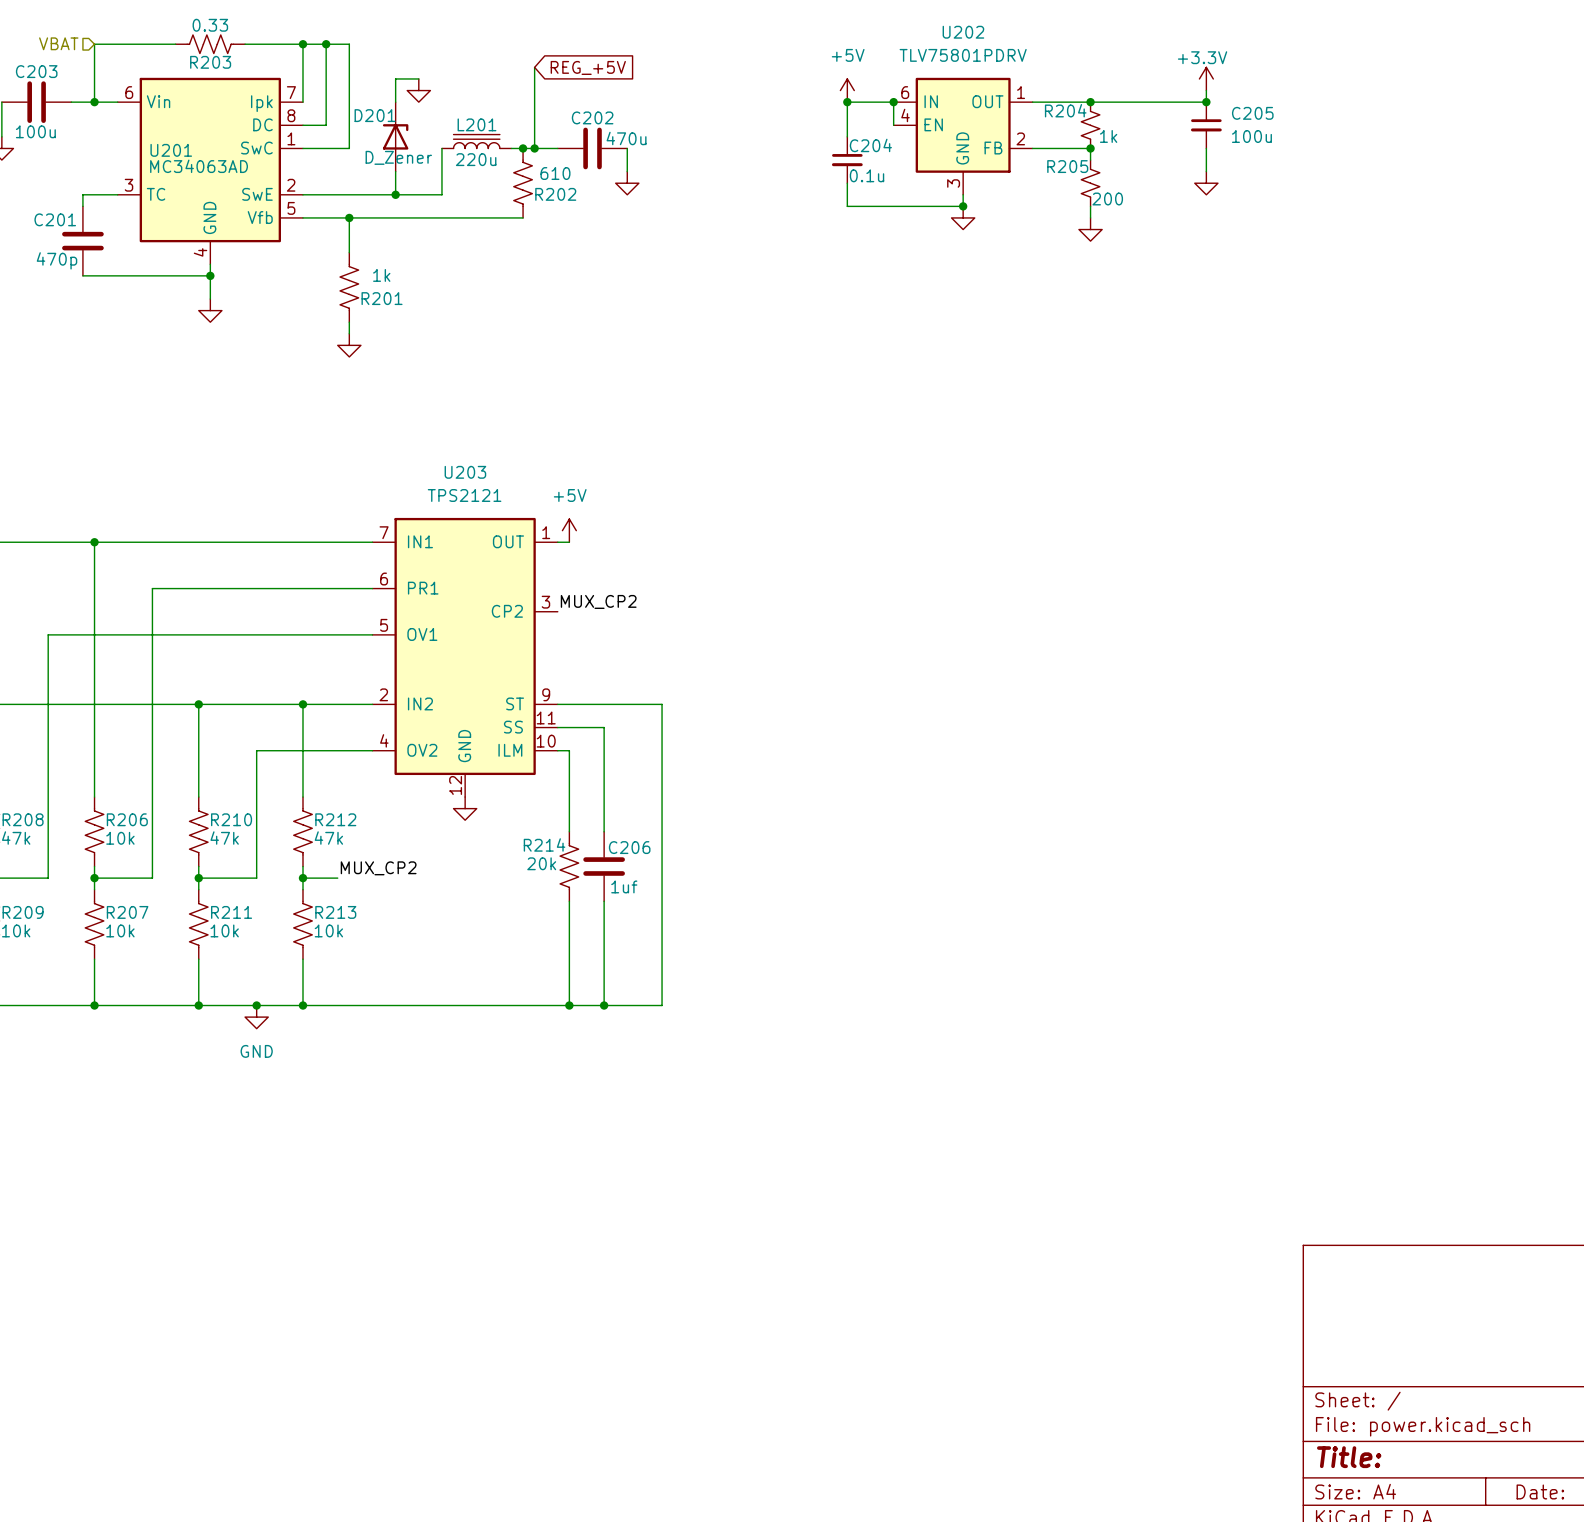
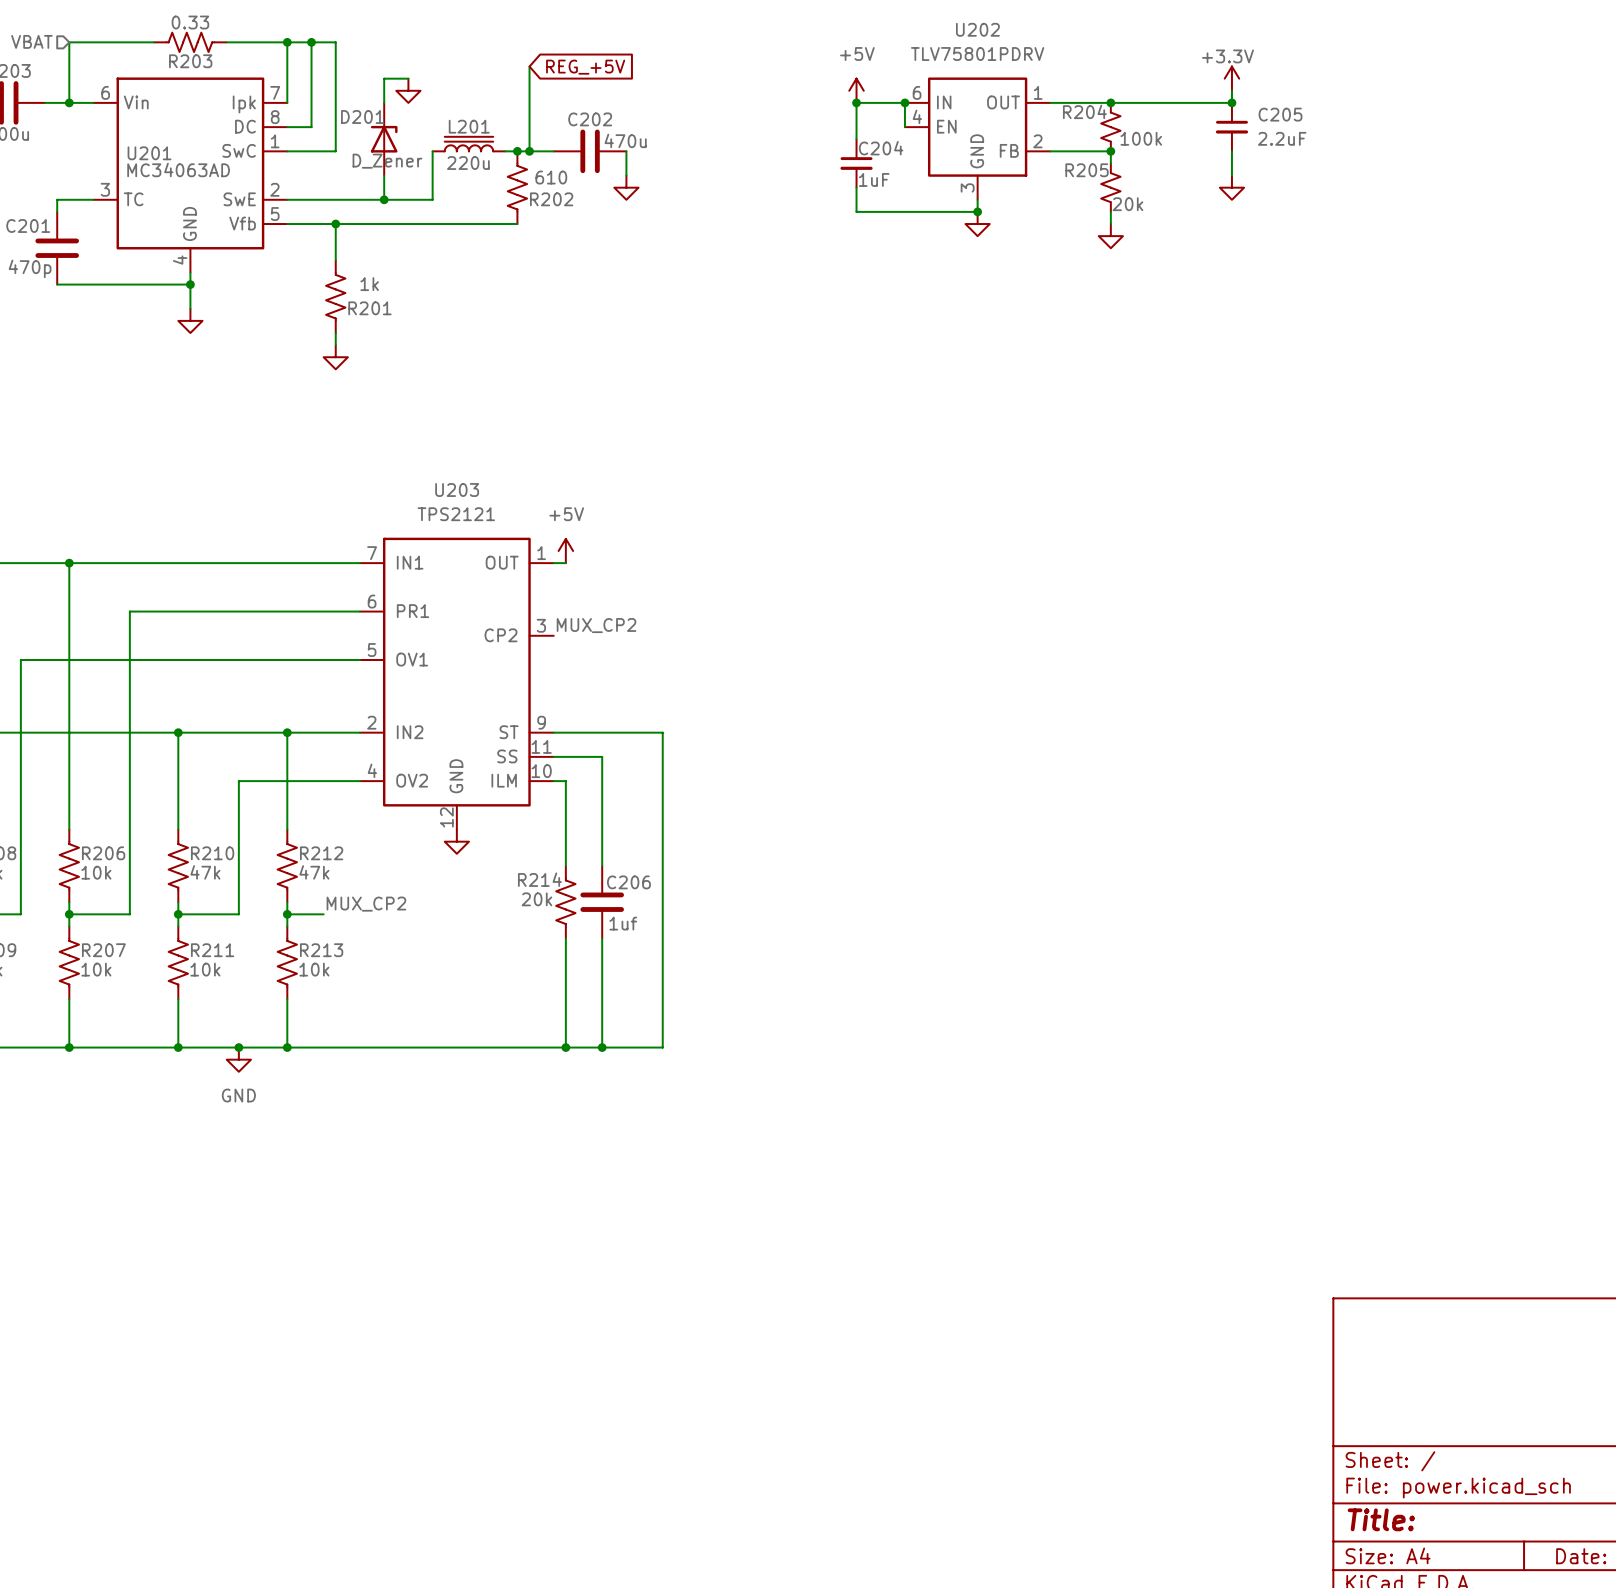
R204 value: 1k (1108, 136) -> 100k (1141, 138)
C205 value: 100u (1251, 136) -> 2.2uF (1282, 138)
C204 value: 0.1u (867, 175) -> 1uF (874, 179)
R205 value: 200 (1107, 198) -> 20k (1127, 204)

